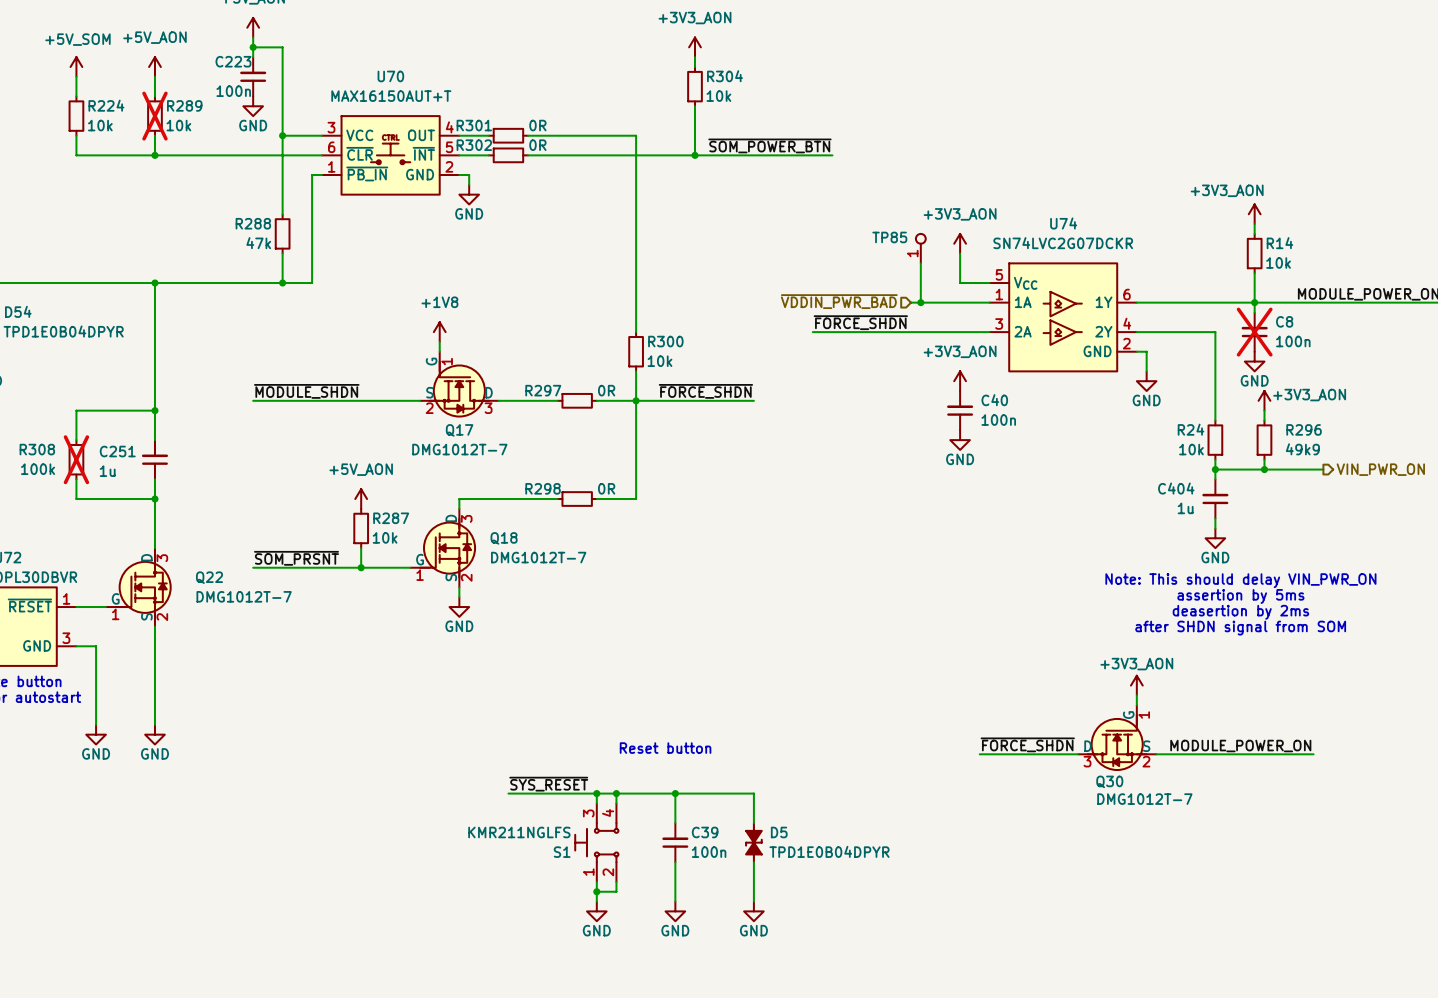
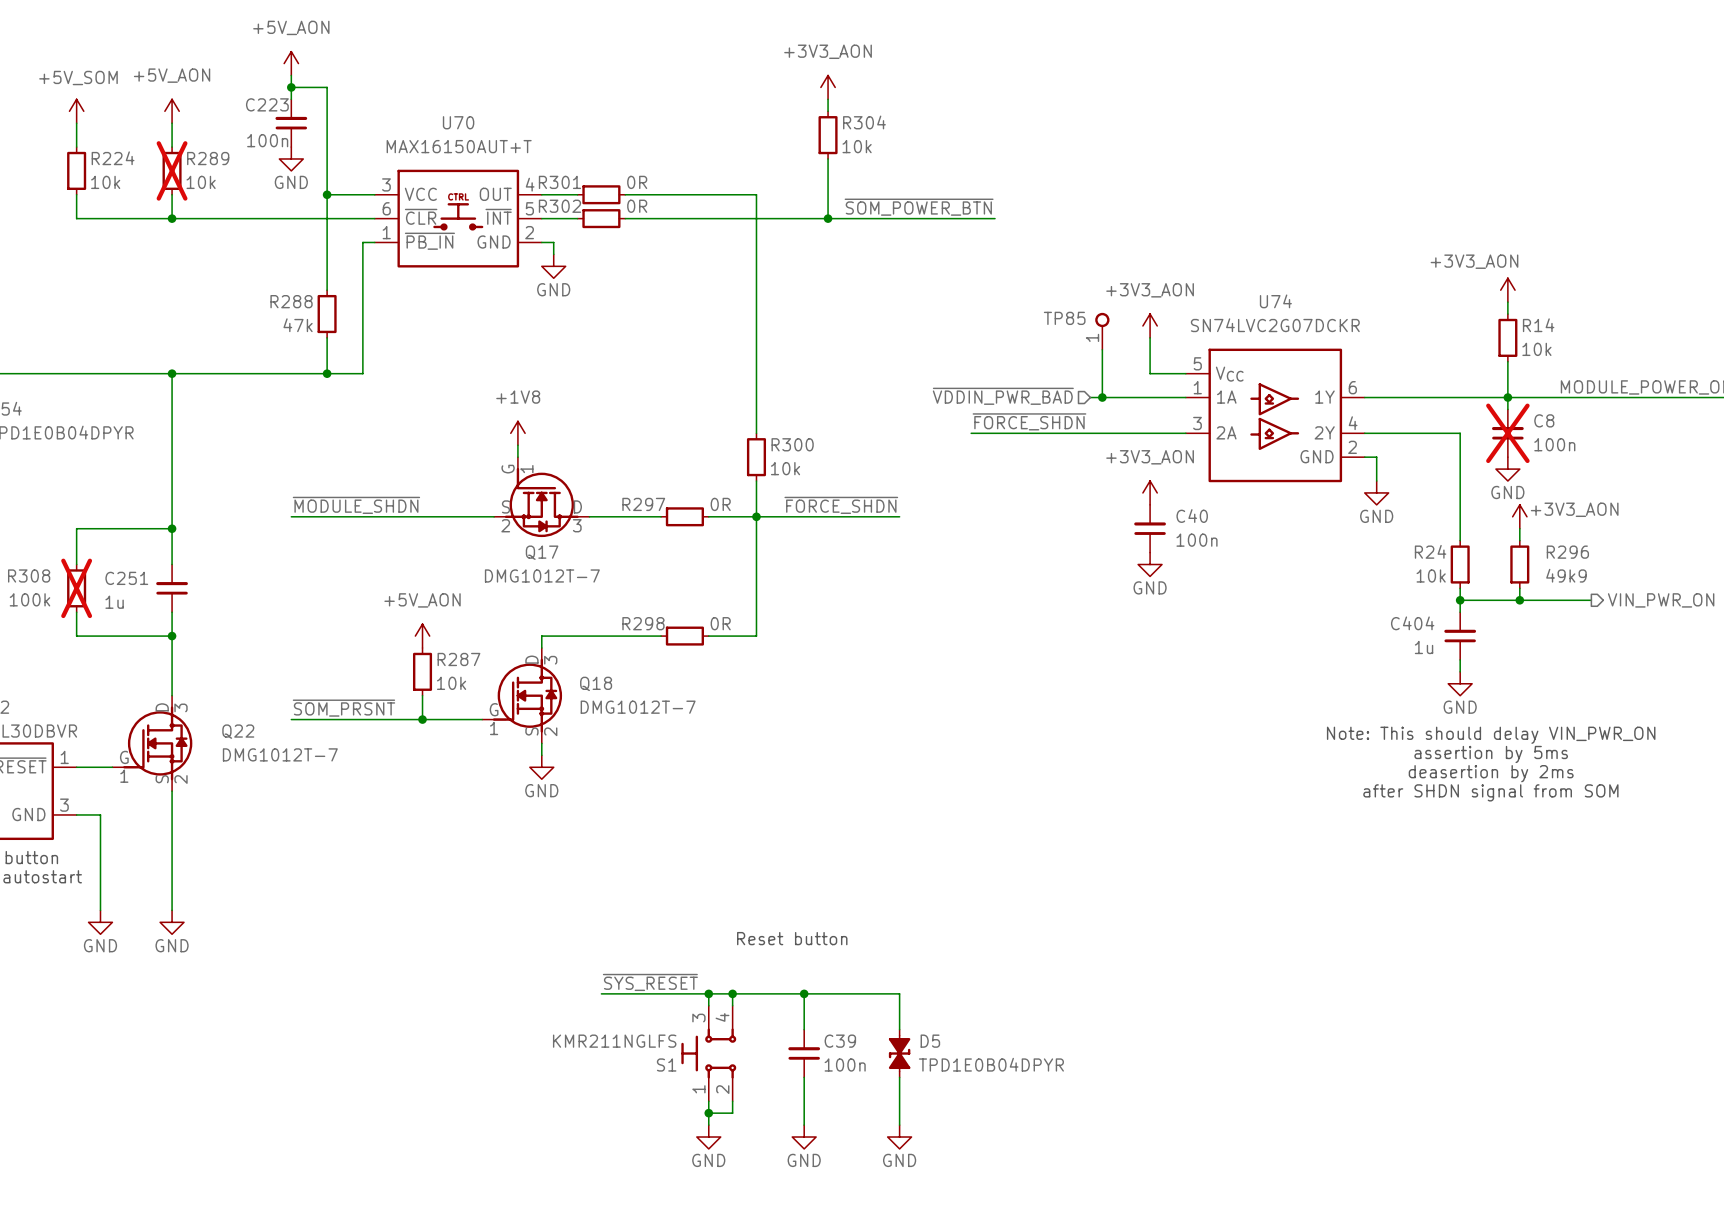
power symbol: +3V3_AON (1136, 685) -> none
wire: (1136, 695) (1136, 705) -> none
Q30: (1117, 738) -> none
label: ~{FORCE_SHDN} (1027, 744) -> none
label: MODULE_POWER_ON (1240, 746) -> none
wire: (979, 754) (1077, 754) -> none
wire: (1156, 754) (1313, 754) -> none

